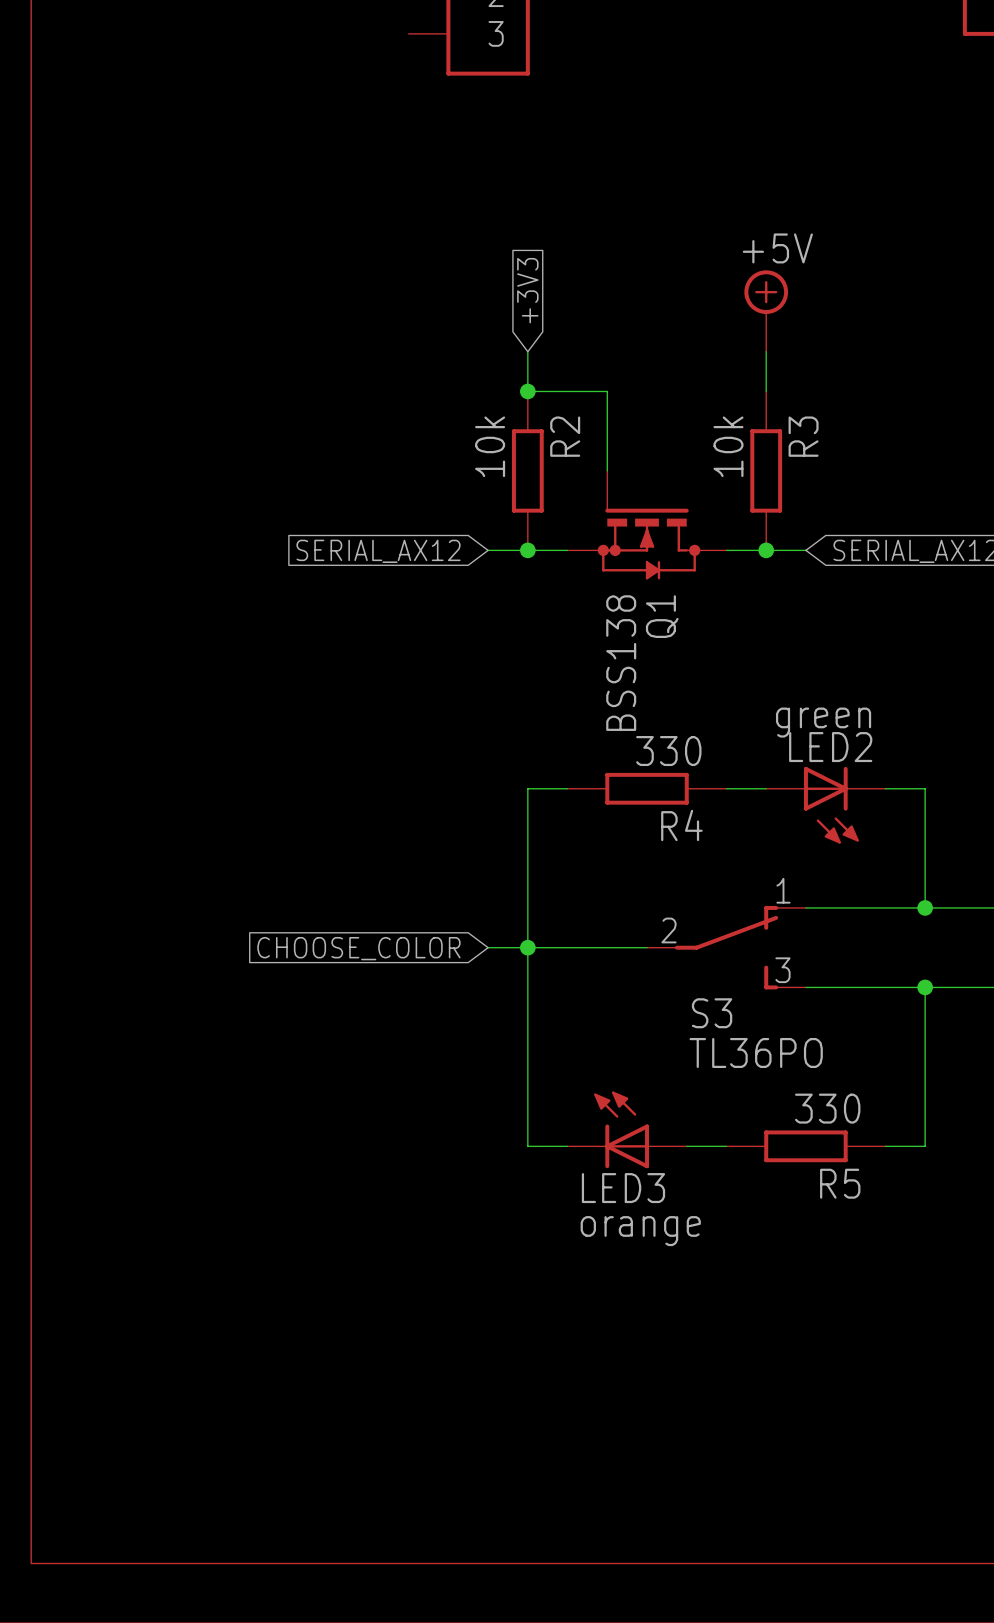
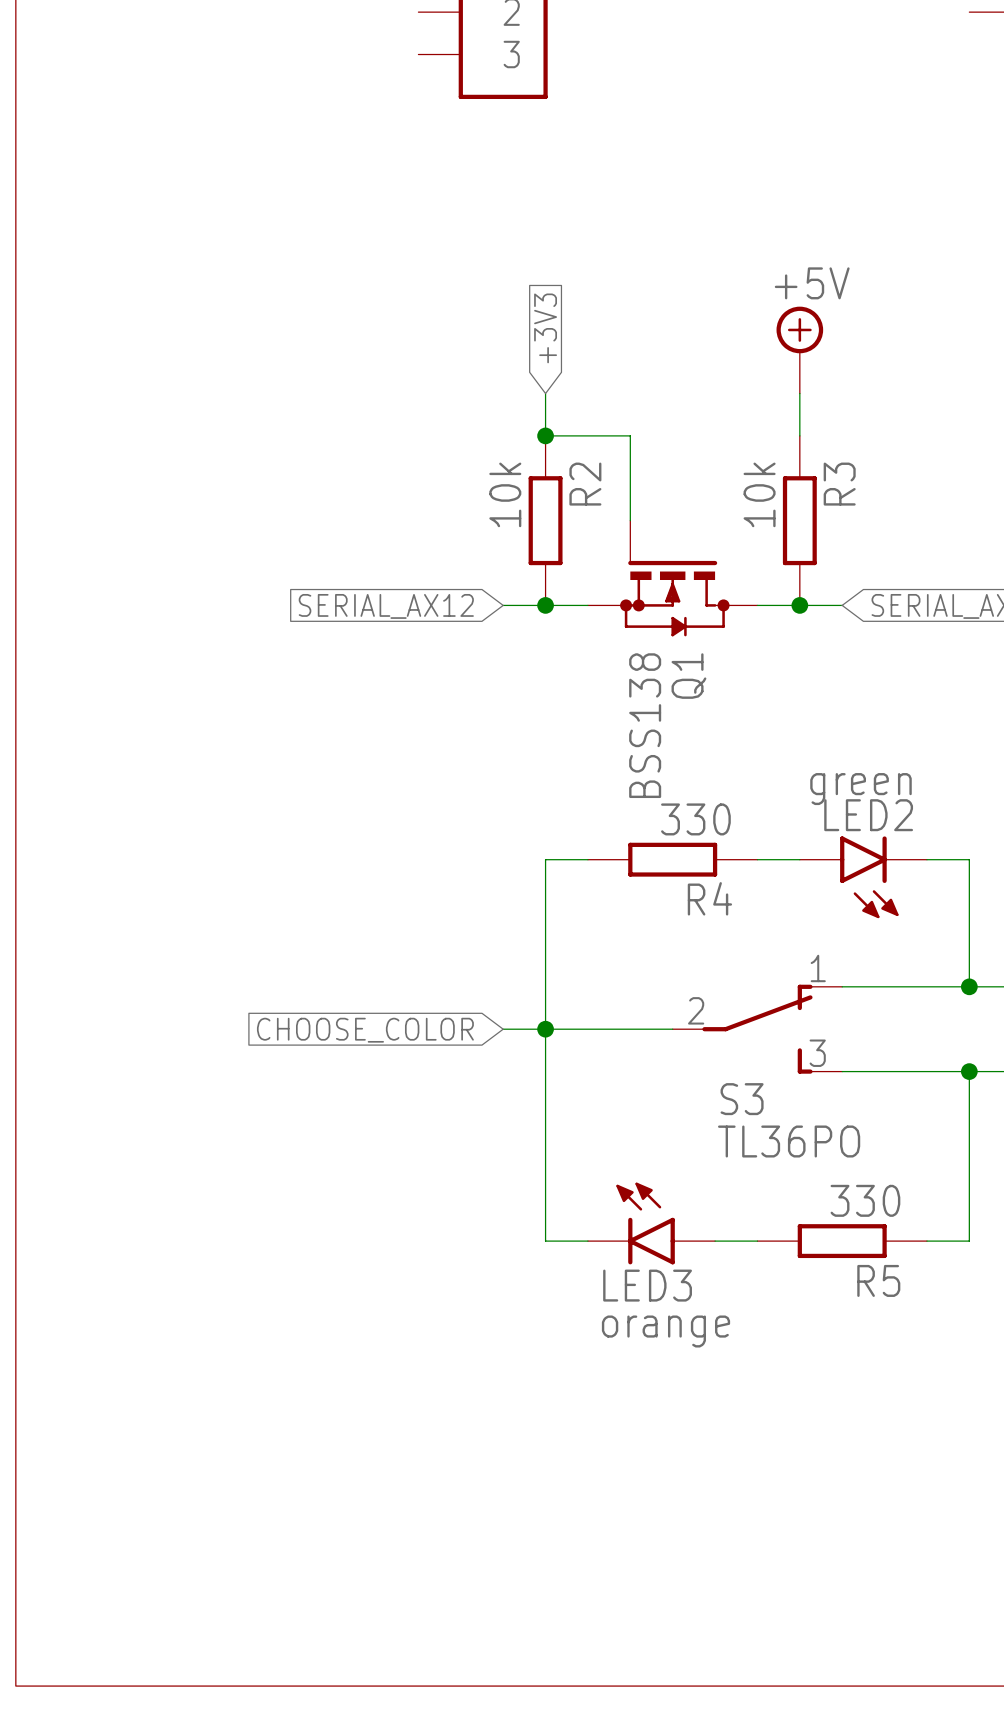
LED2 symbol: [766, 766, 886, 844] -> [799, 836, 927, 919]
LED3 symbol: [567, 1091, 687, 1169] -> [587, 1182, 716, 1265]

